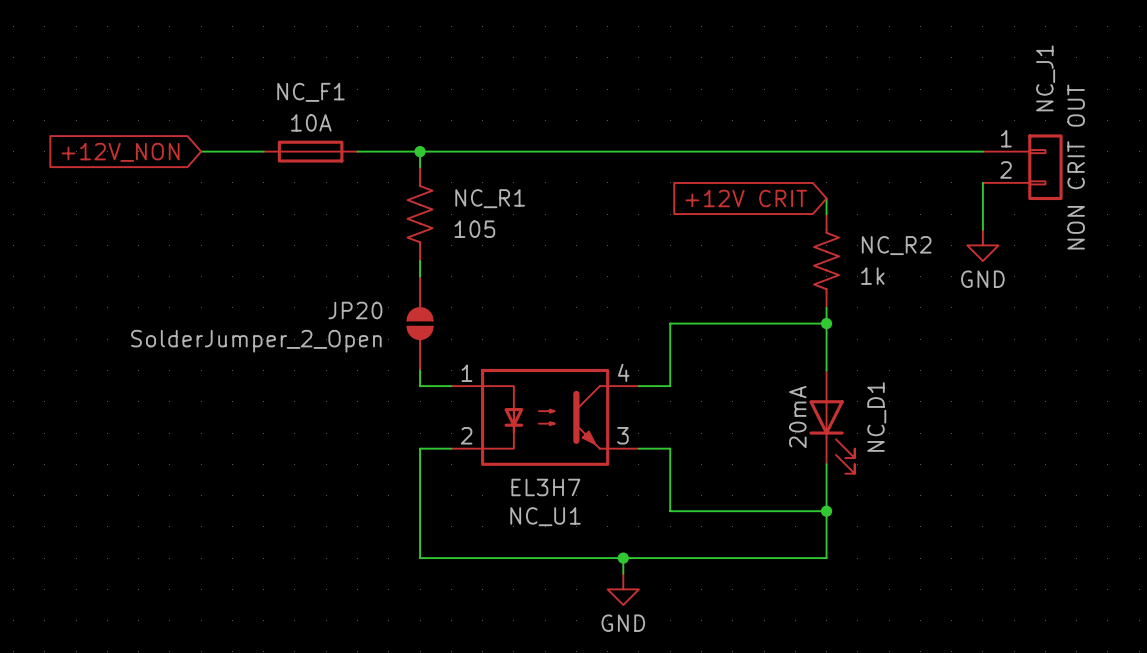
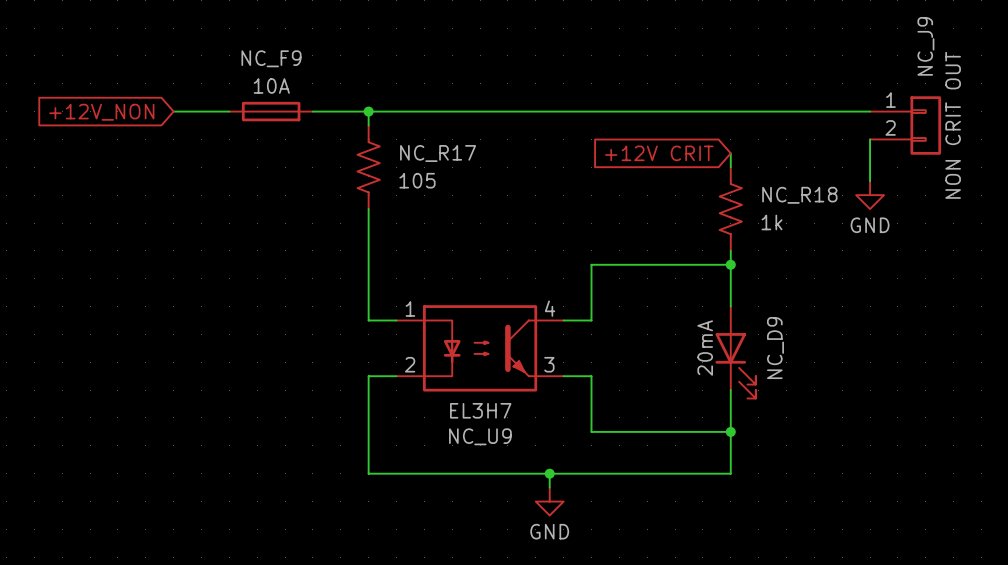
NC_J1 name: NC_J1 (1045, 78) -> NC_J9 (925, 46)
NC_F1 name: NC_F1 (310, 92) -> NC_F9 (271, 58)
NC_R1 name: NC_R1 (490, 198) -> NC_R17 (438, 153)
NC_R2 name: NC_R2 (896, 245) -> NC_R18 (799, 195)
JP20: SolderJumper_2_Open (420, 323) -> none
NC_D1 name: NC_D1 (876, 417) -> NC_D9 (775, 348)
NC_U1 name: NC_U1 (545, 516) -> NC_U9 (480, 436)

